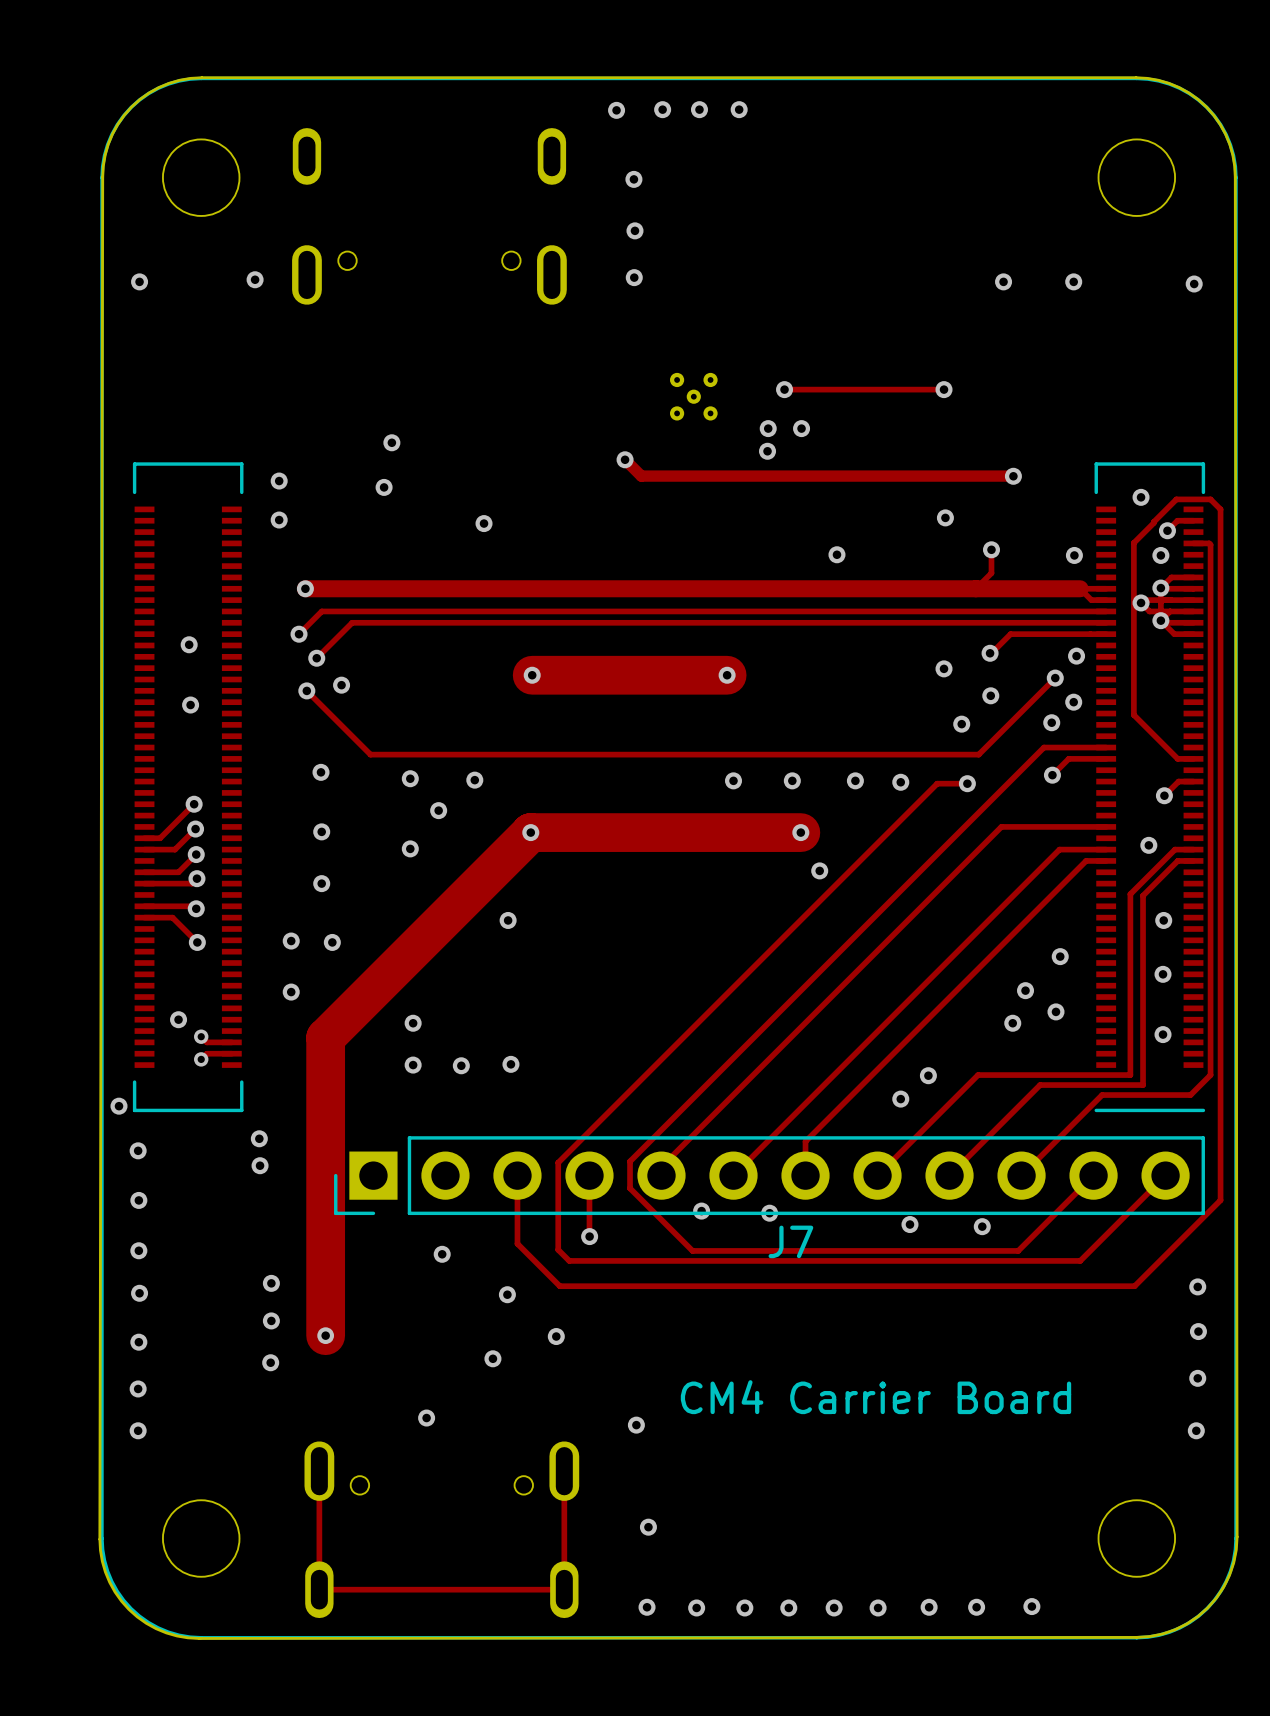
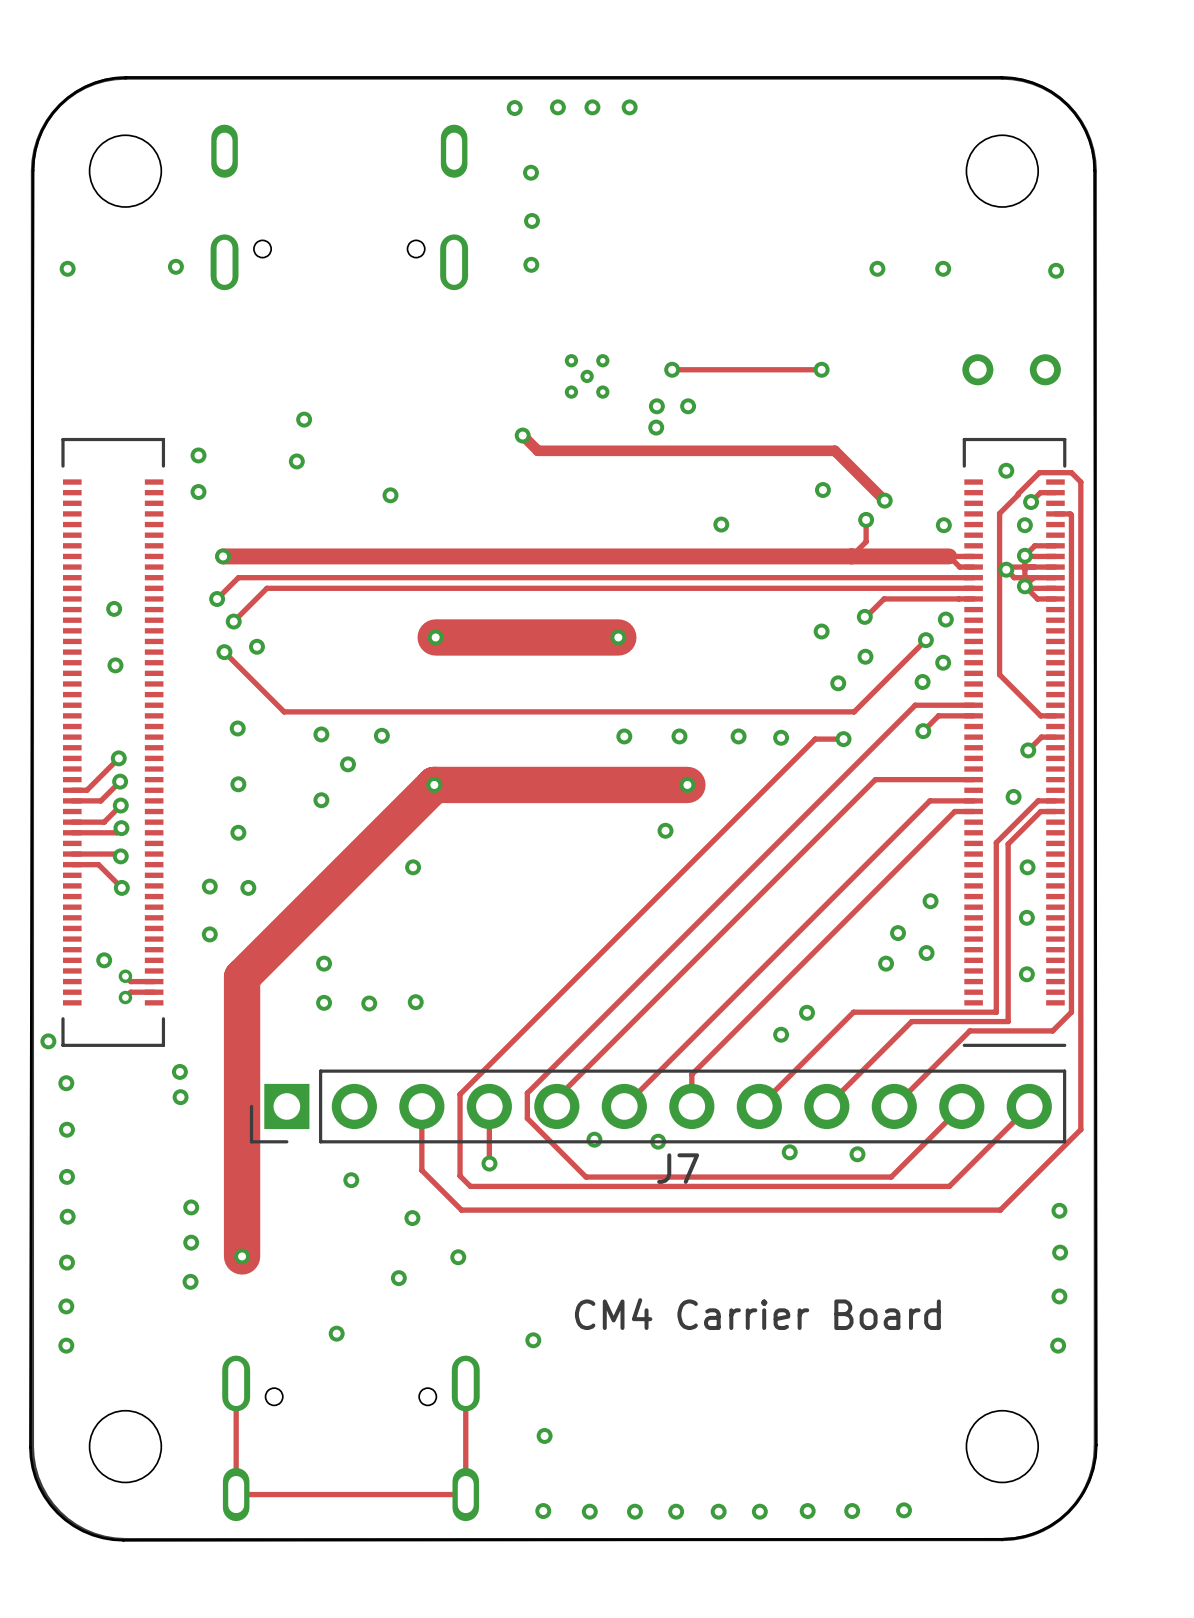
part: none -> (1011, 369)
track: (958, 476) (1013, 476) -> (834, 450) (884, 500)
via position: (1013, 476) -> (884, 500)
via position: (819, 870) -> (665, 830)

